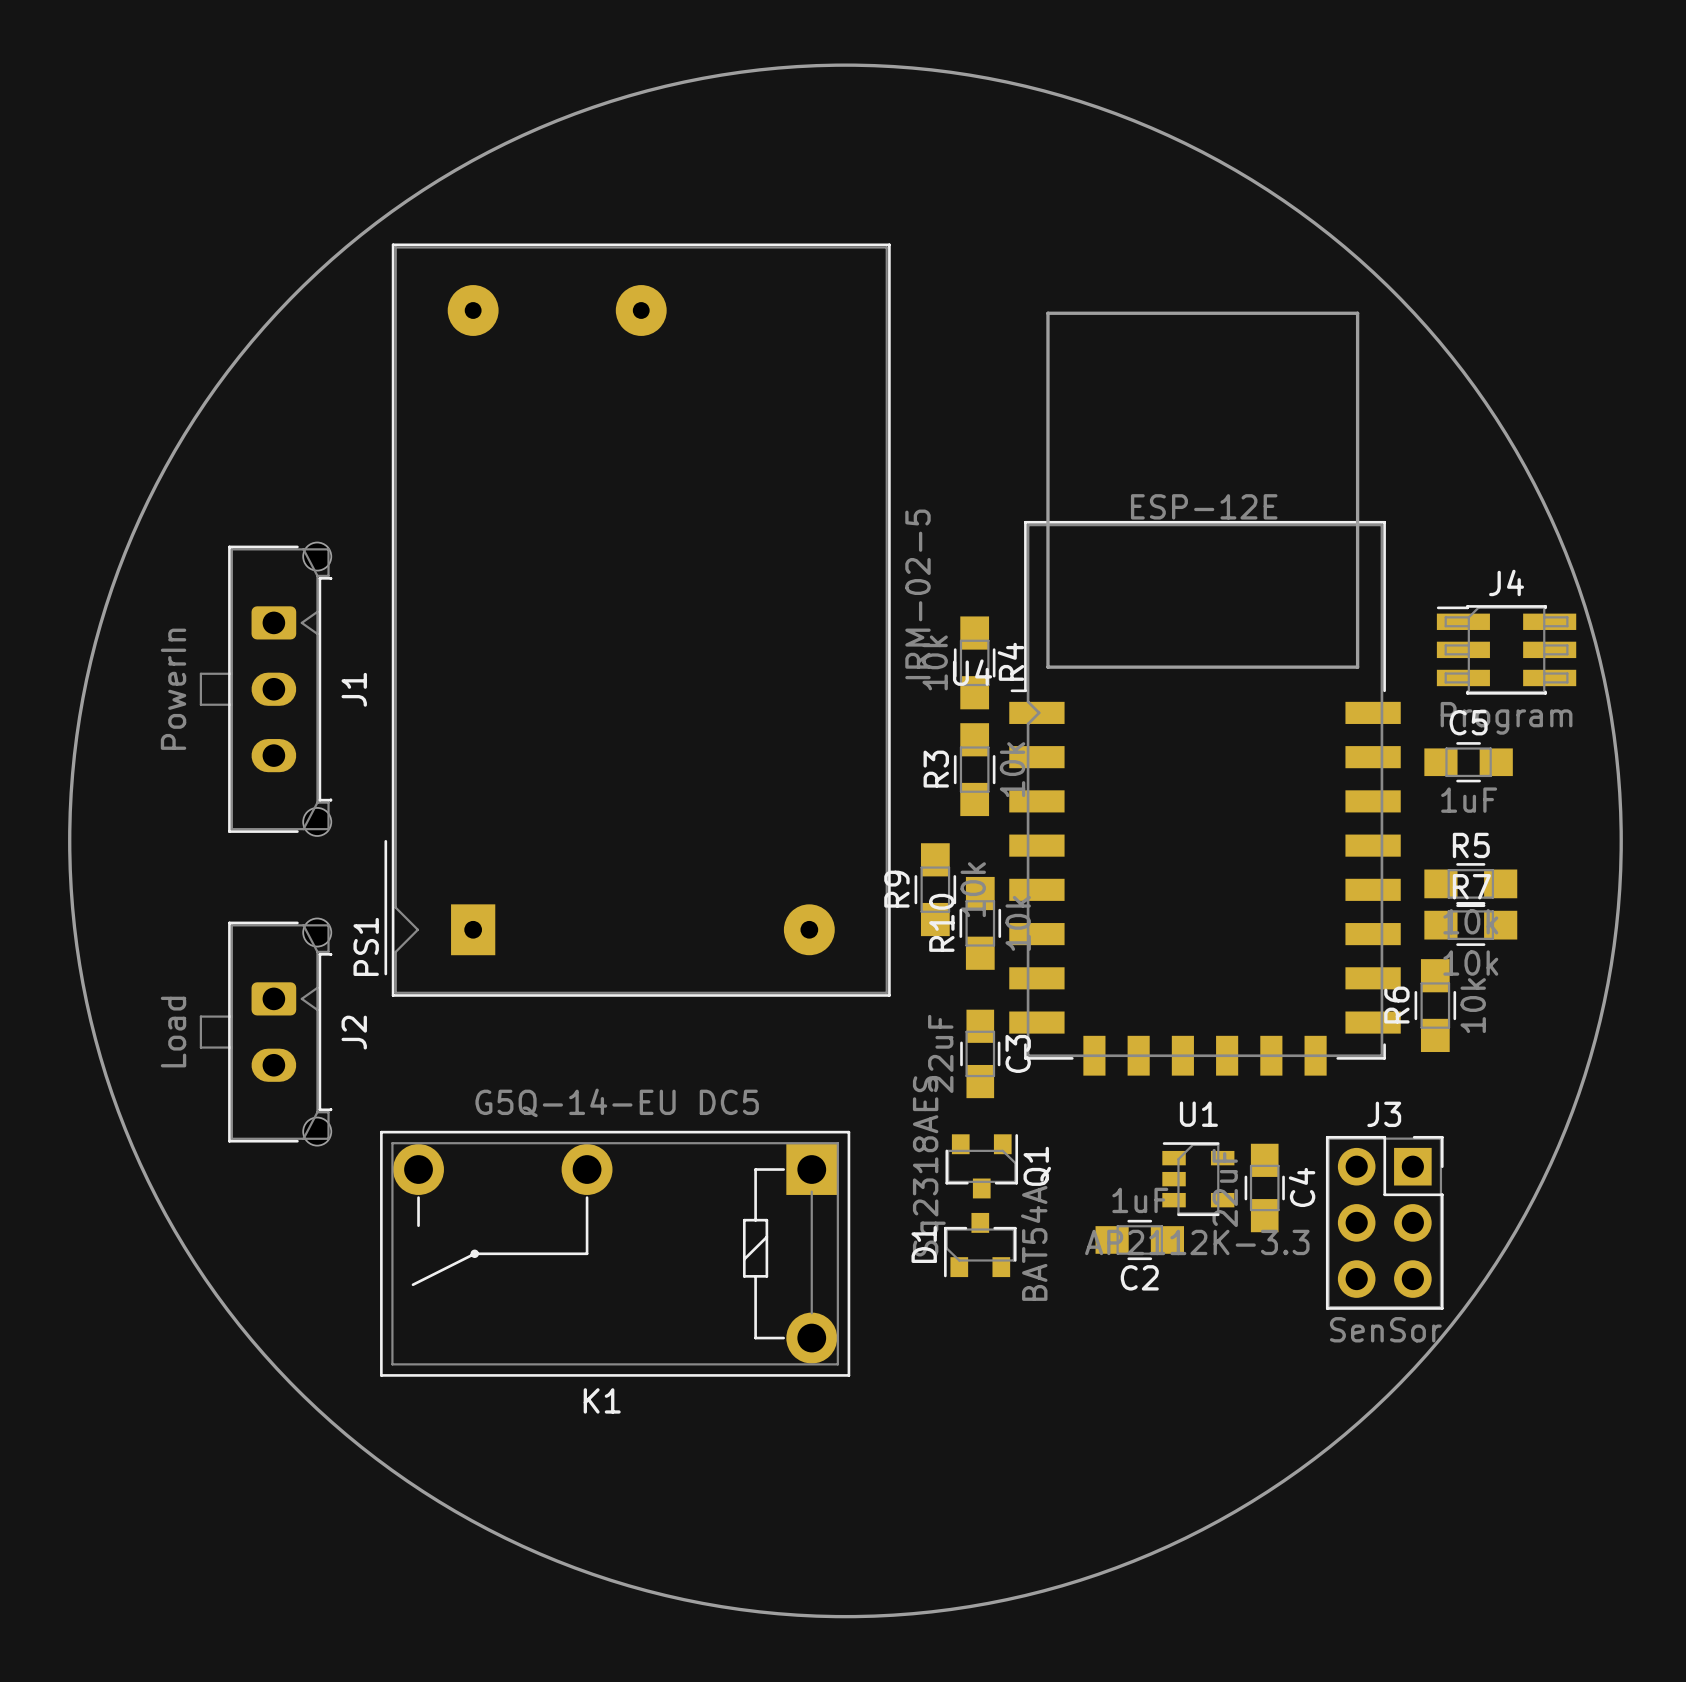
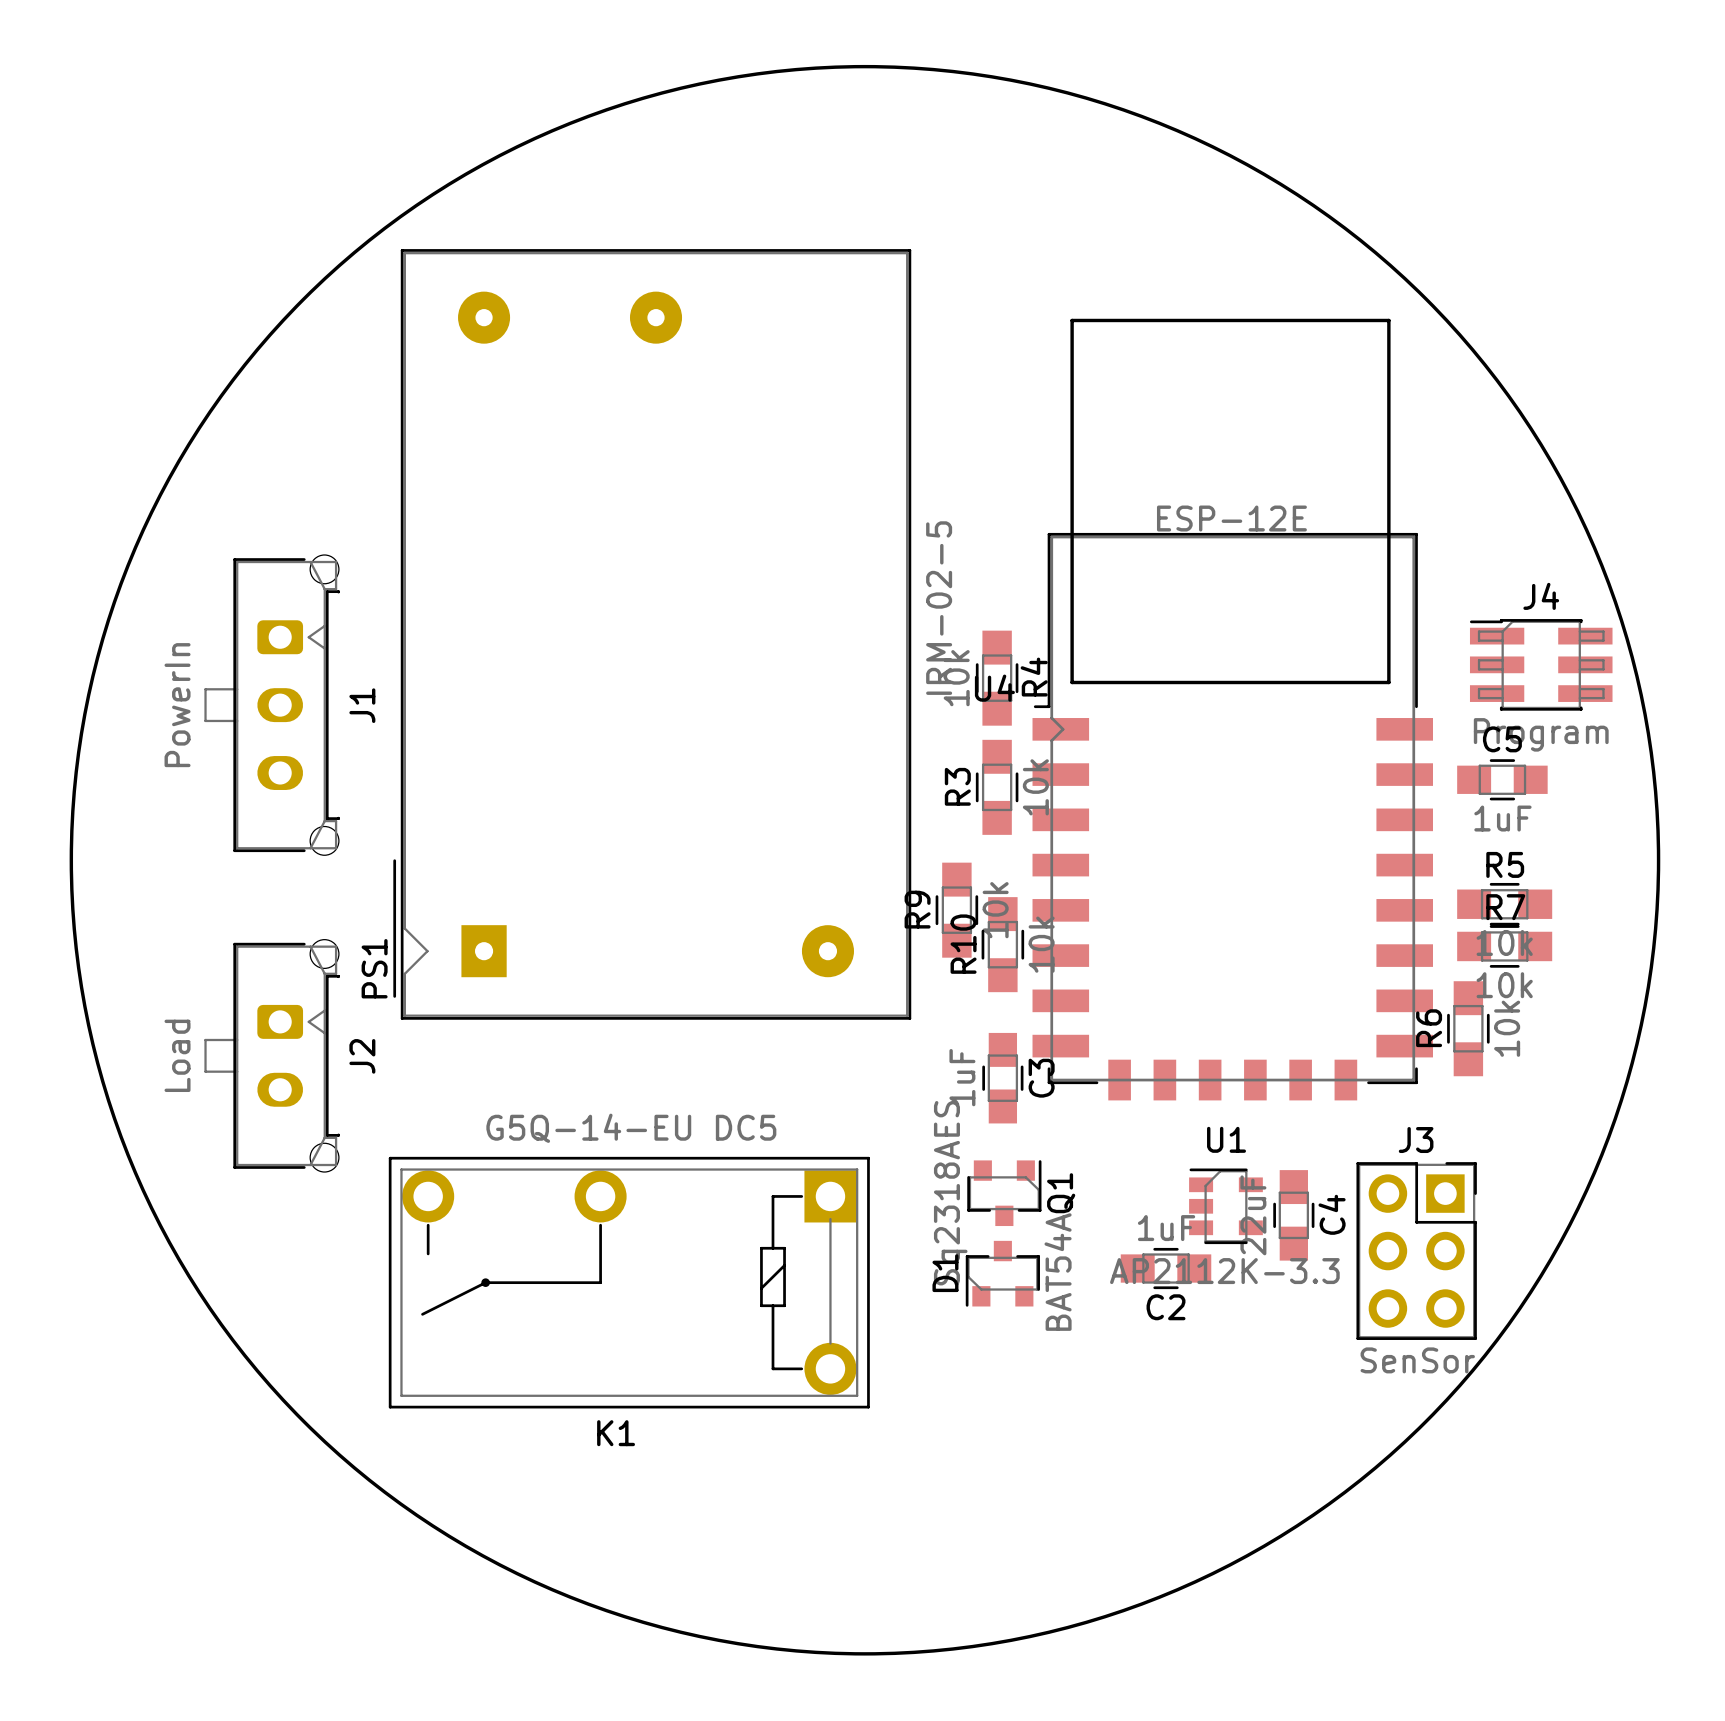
C3 value: 22uF (940, 1053) -> 1uF (962, 1077)

